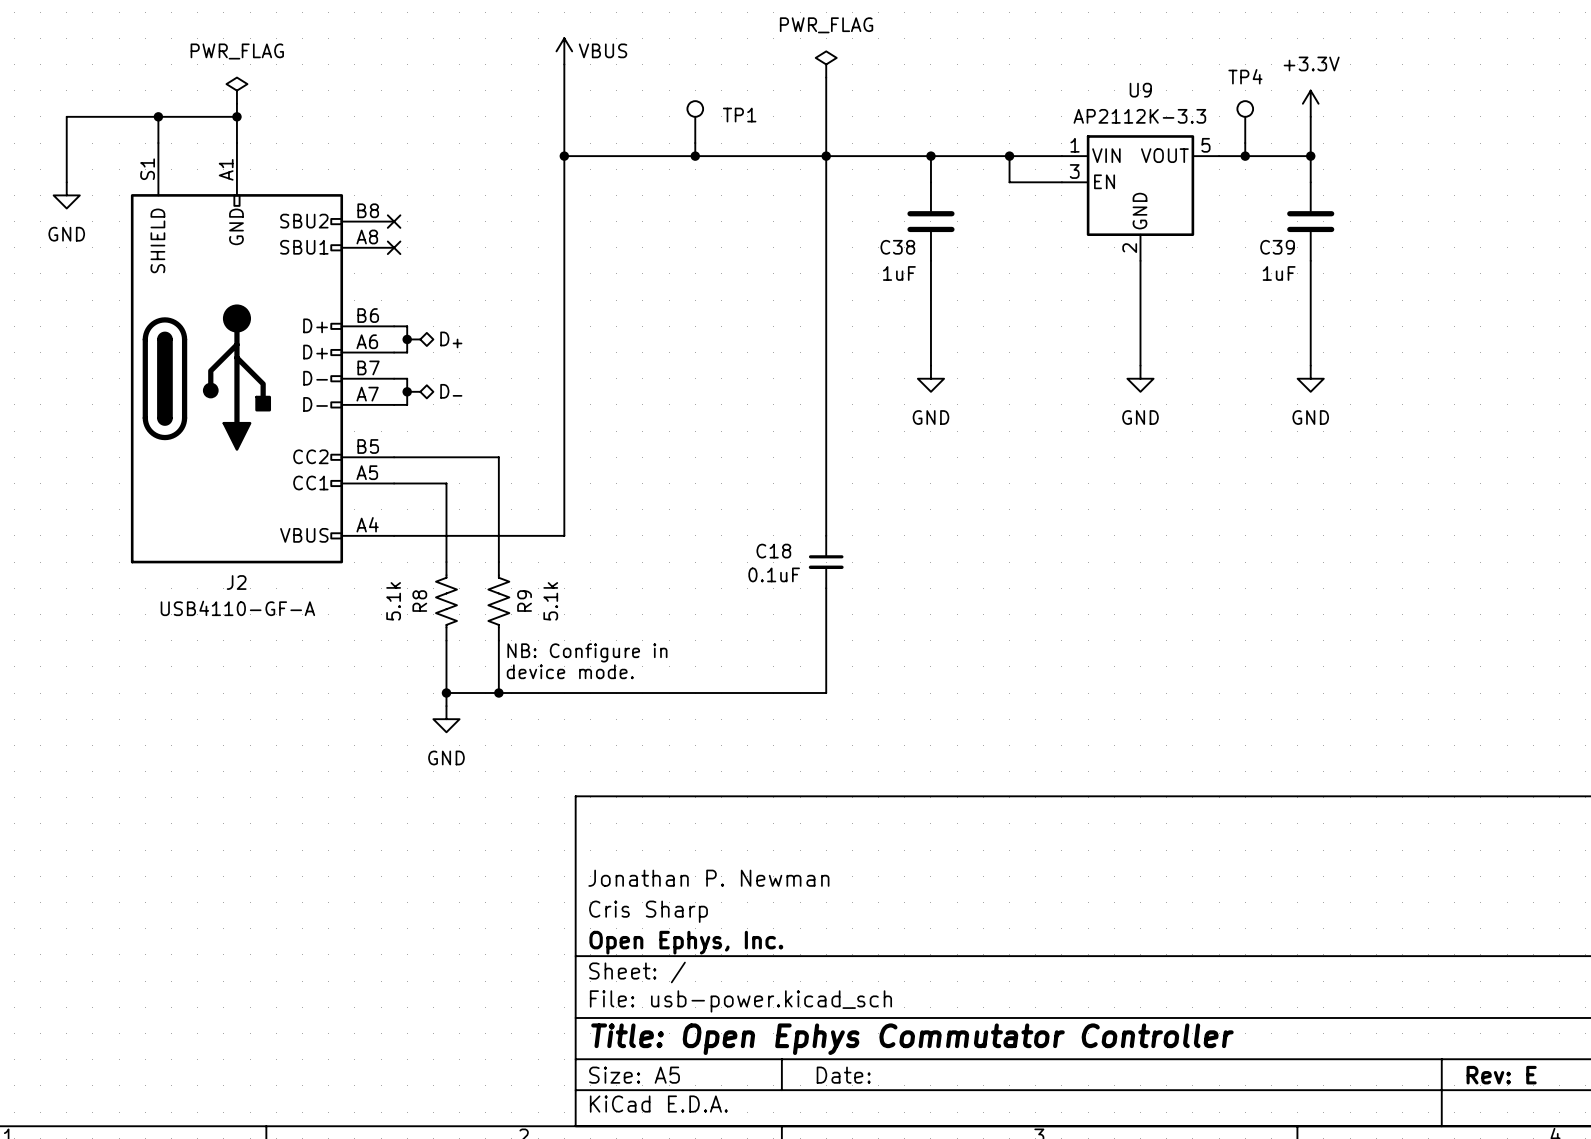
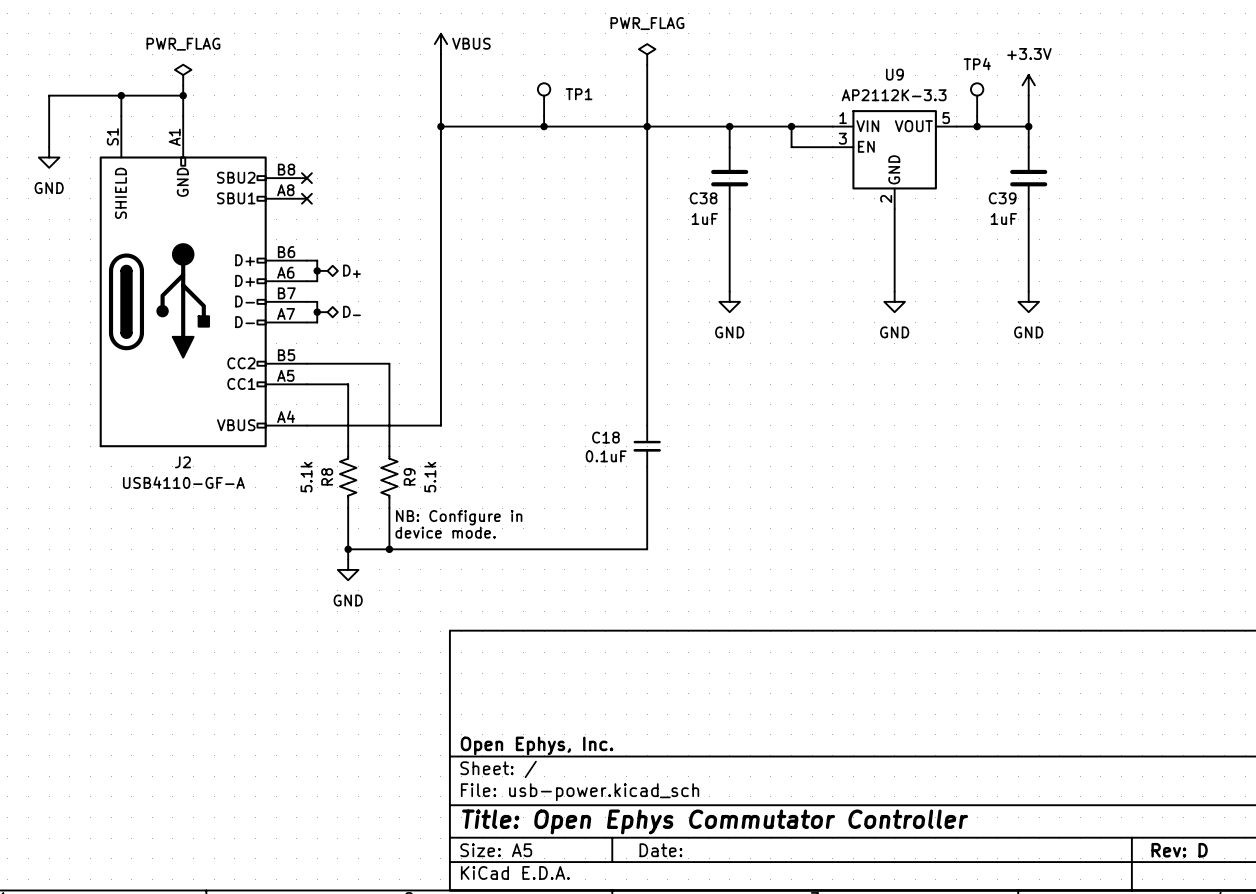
title block: Jonathan P. Newman (708, 878) -> none
title block: Cris Sharp (648, 911) -> none
title block: Rev: E (1501, 1075) -> Rev: D (1179, 850)

